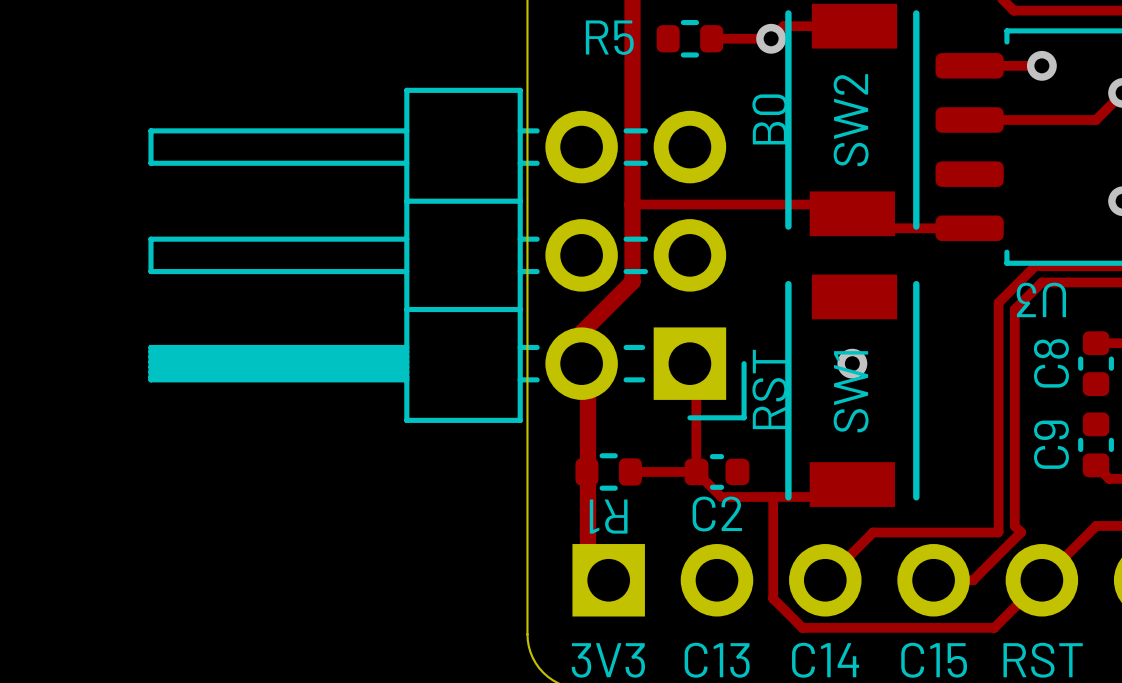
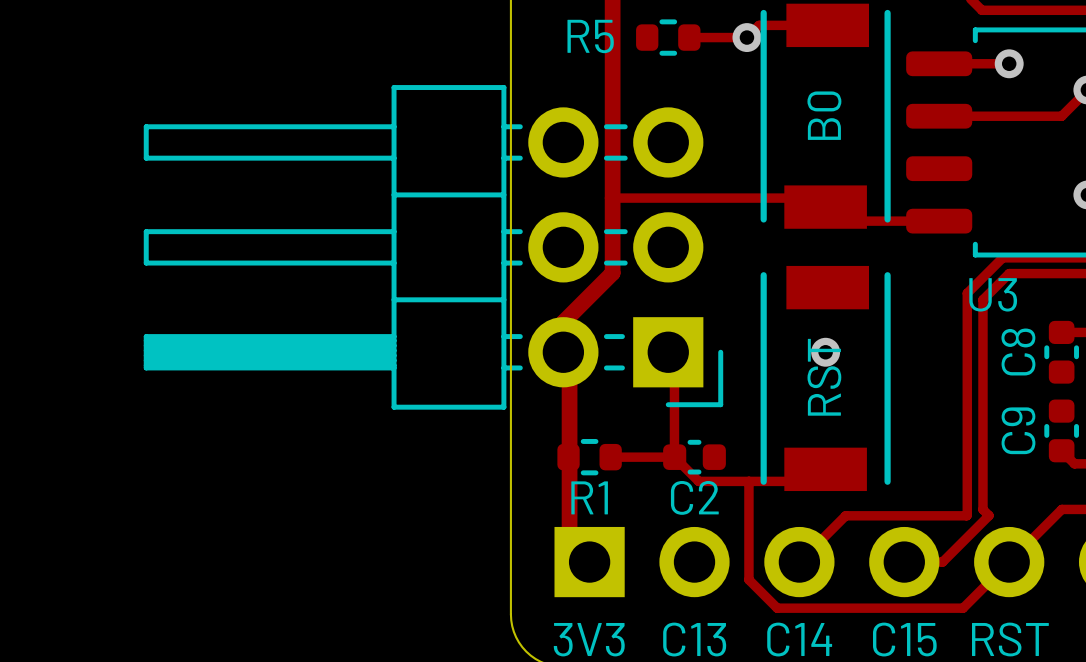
text position: B0 (769, 119) -> B0 (824, 115)
SW2 name: SW2 (851, 120) -> none
U3 name rotation: 0° (1041, 299) -> 180° (993, 294)
text position: RST (769, 389) -> RST (824, 377)
SW1 name: SW1 (851, 391) -> none
R1 name rotation: 0° (608, 516) -> 180° (589, 497)

